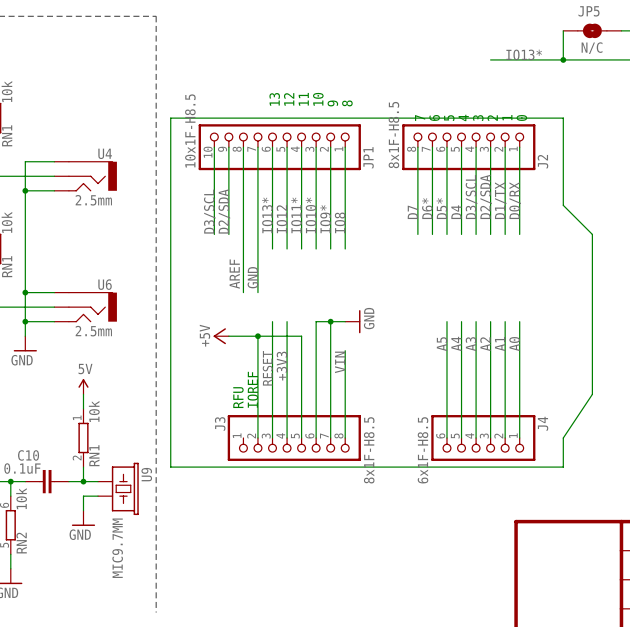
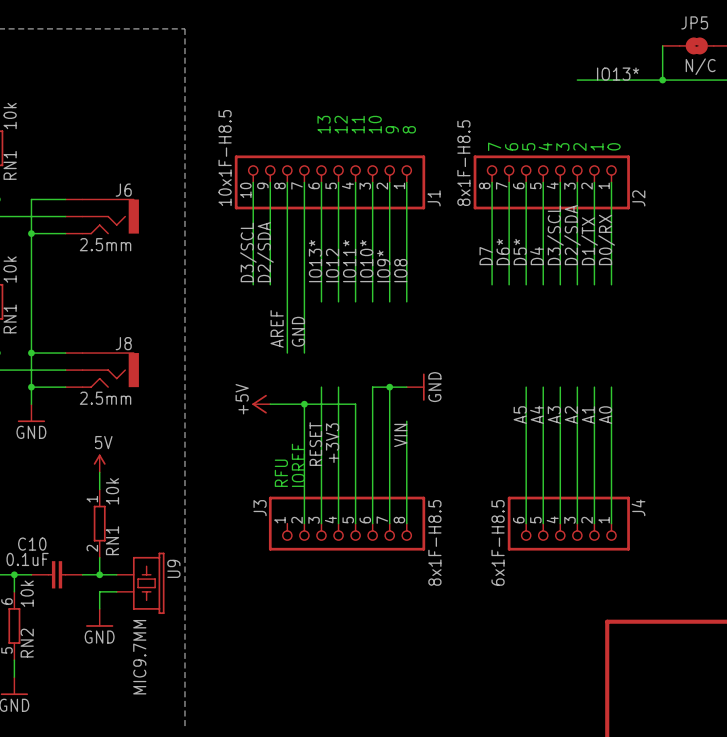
wire: (170, 118) (170, 467) (563, 467) (563, 438) (592, 394) (592, 234) (563, 205) (563, 118) (170, 118) -> none
U4 name: U4 (105, 153) -> J6 (123, 190)
JP1 name: JP1 (368, 157) -> J1 (434, 198)
U6 name: U6 (105, 284) -> J8 (123, 343)

